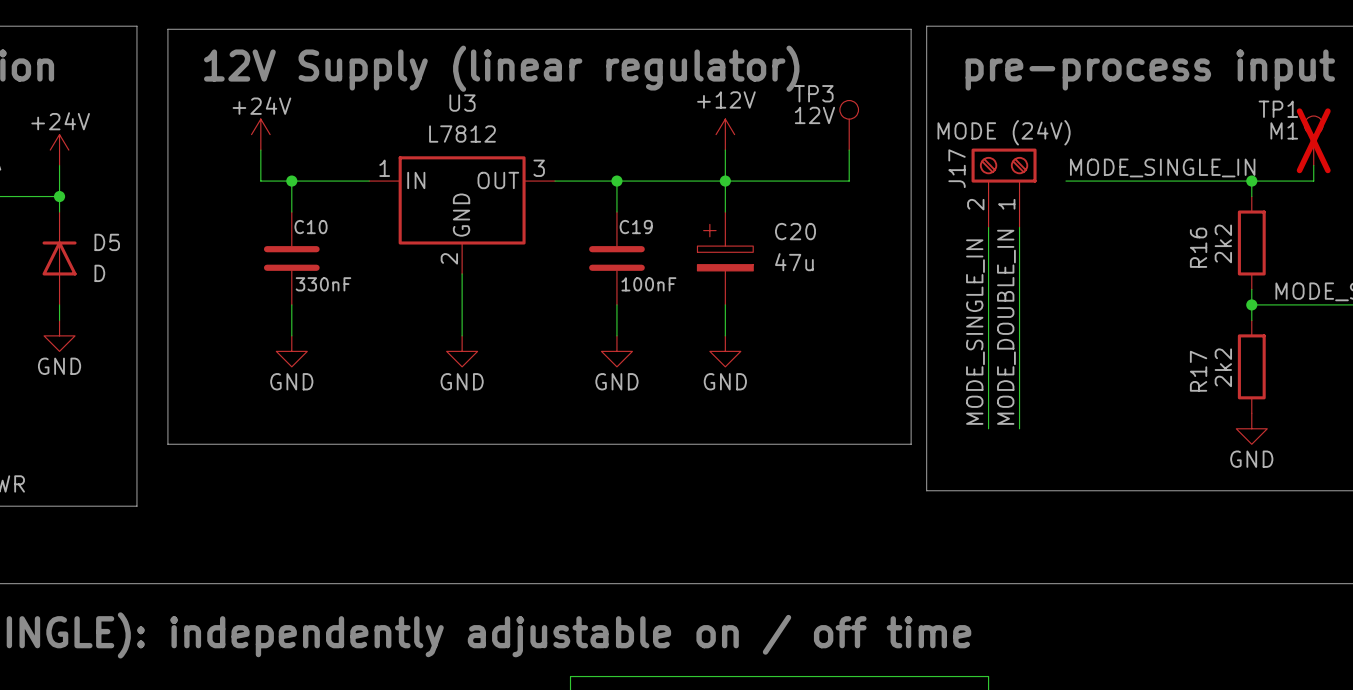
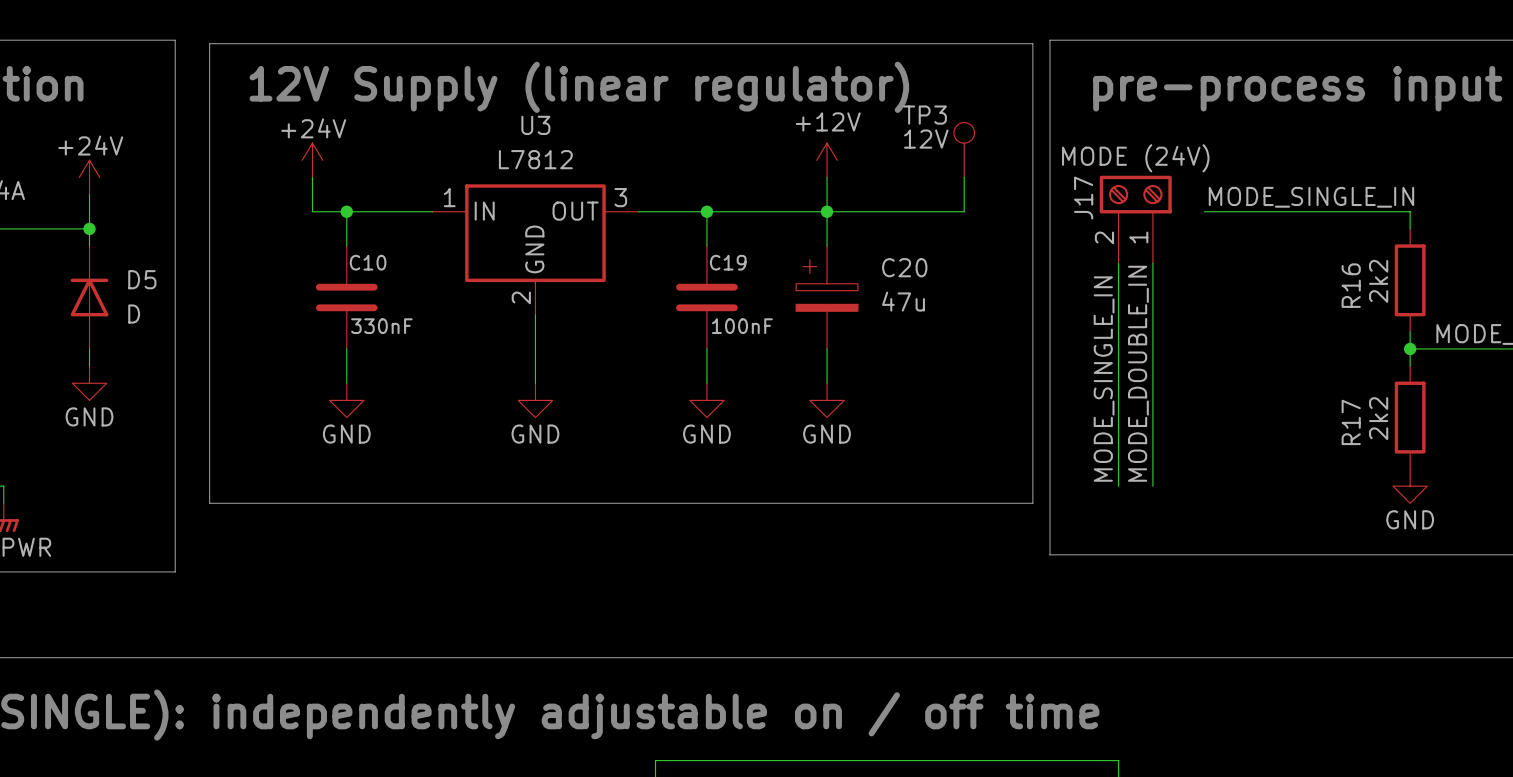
TP1: M1 (1313, 140) -> none
wire: (1313, 165) (1313, 181) (1251, 181) -> none
junction: (1251, 181) -> none

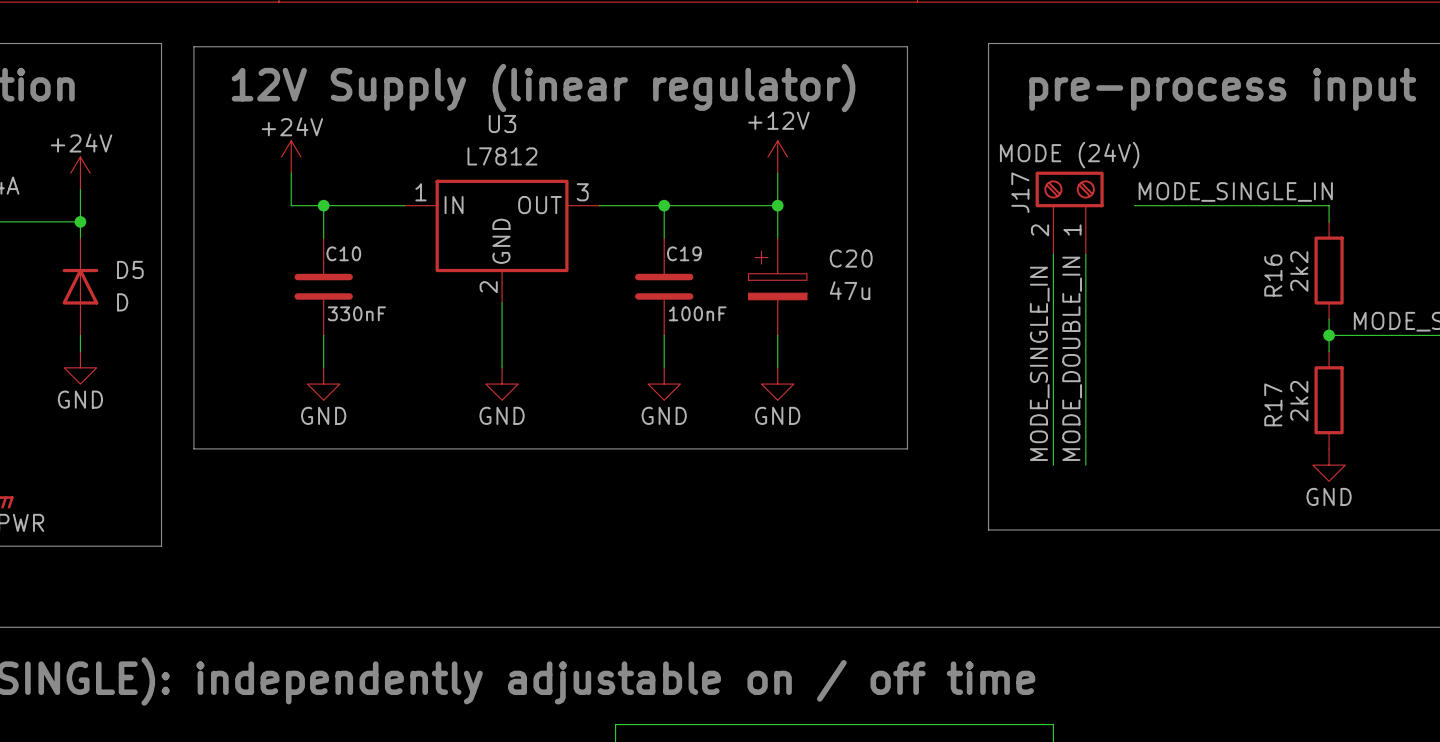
line: (964, 43) (1032, 43) (1032, 503) (209, 503) (209, 469) -> (907, 46) (907, 448) (193, 448)
TP3: 12V (964, 150) -> none
wire: (964, 177) (964, 211) (827, 211) -> none

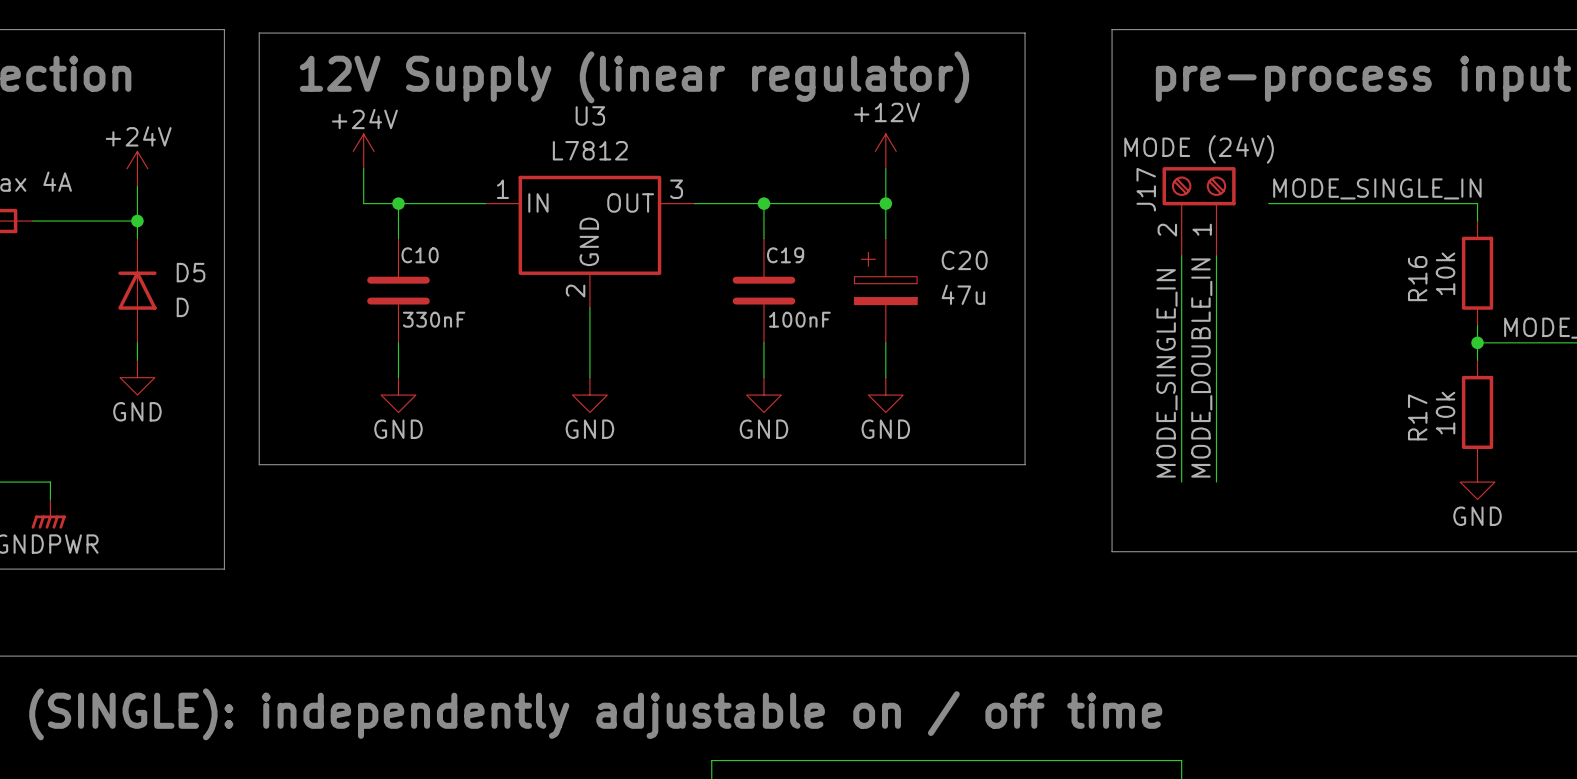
R16 value: 2k2 (1299, 271) -> 10k (1445, 273)
R17 value: 2k2 (1299, 401) -> 10k (1445, 413)

